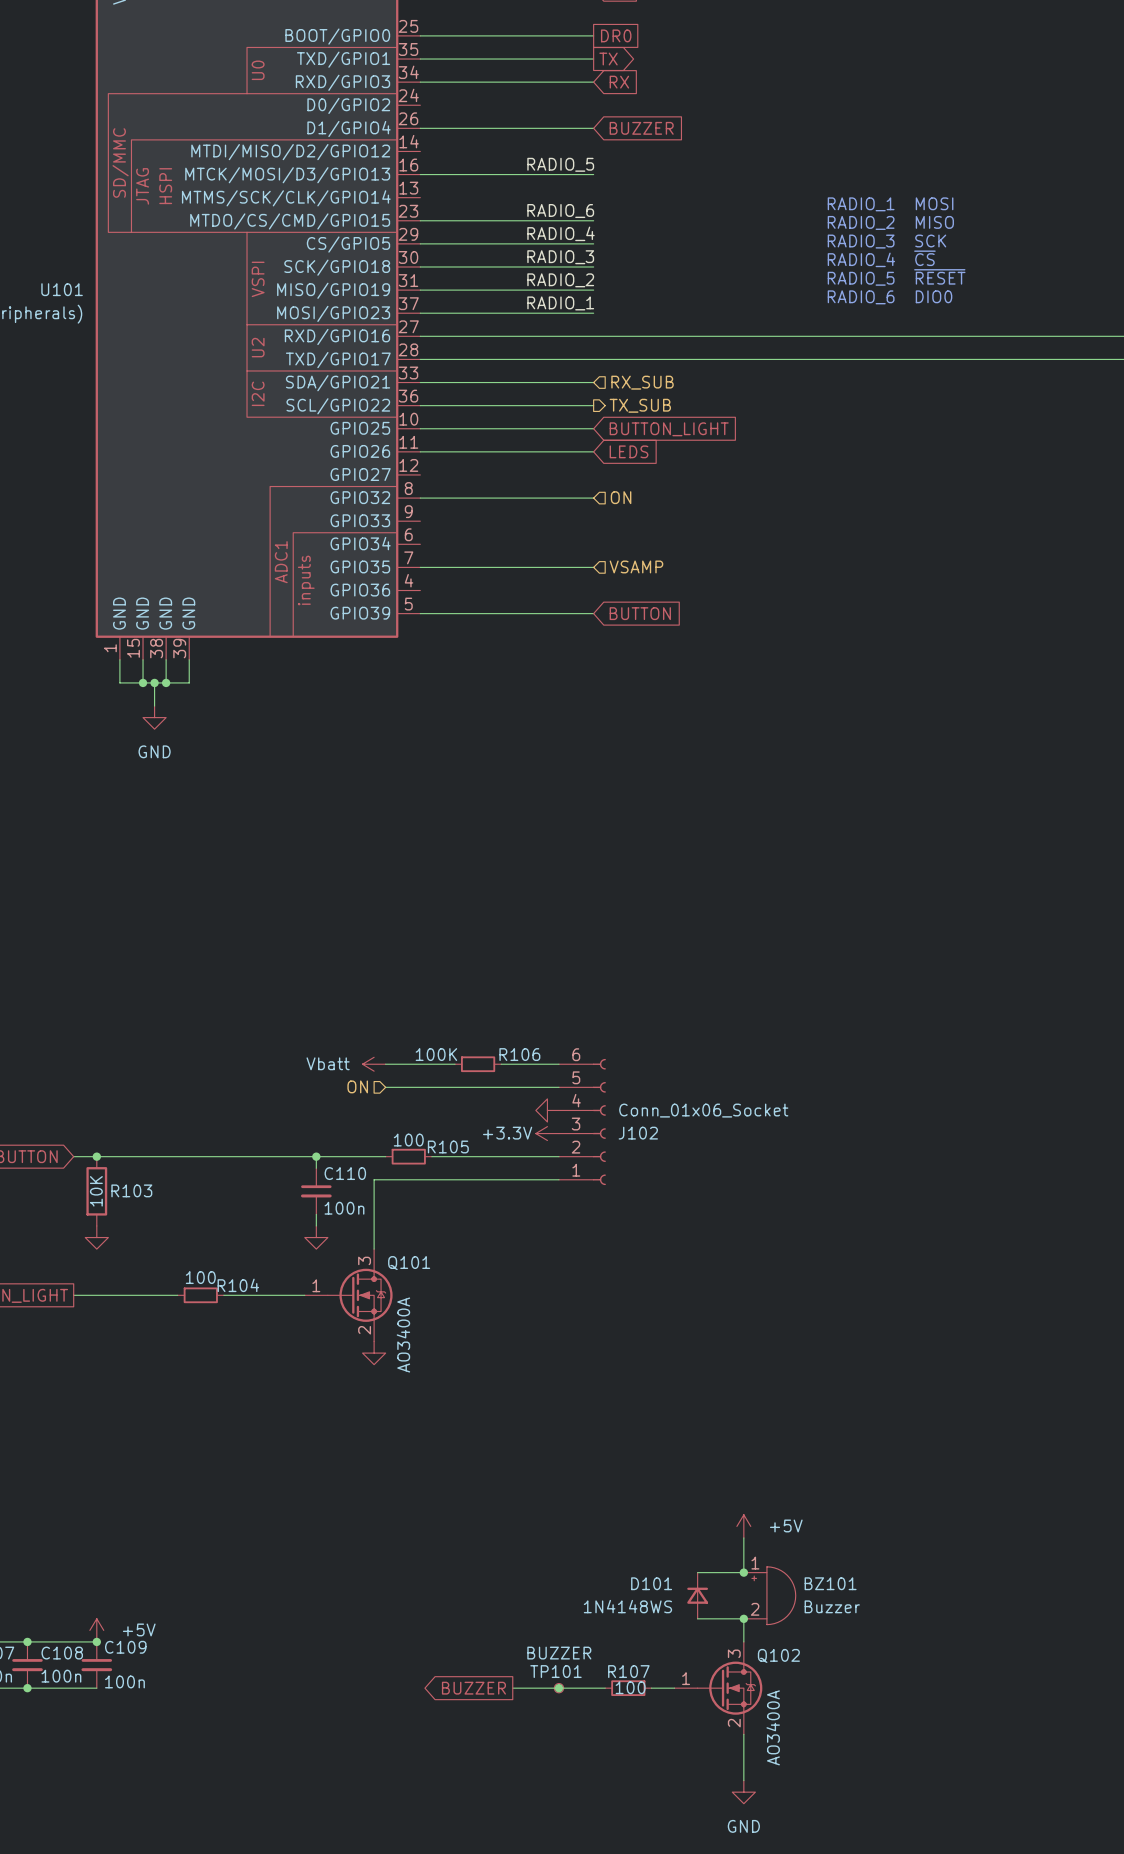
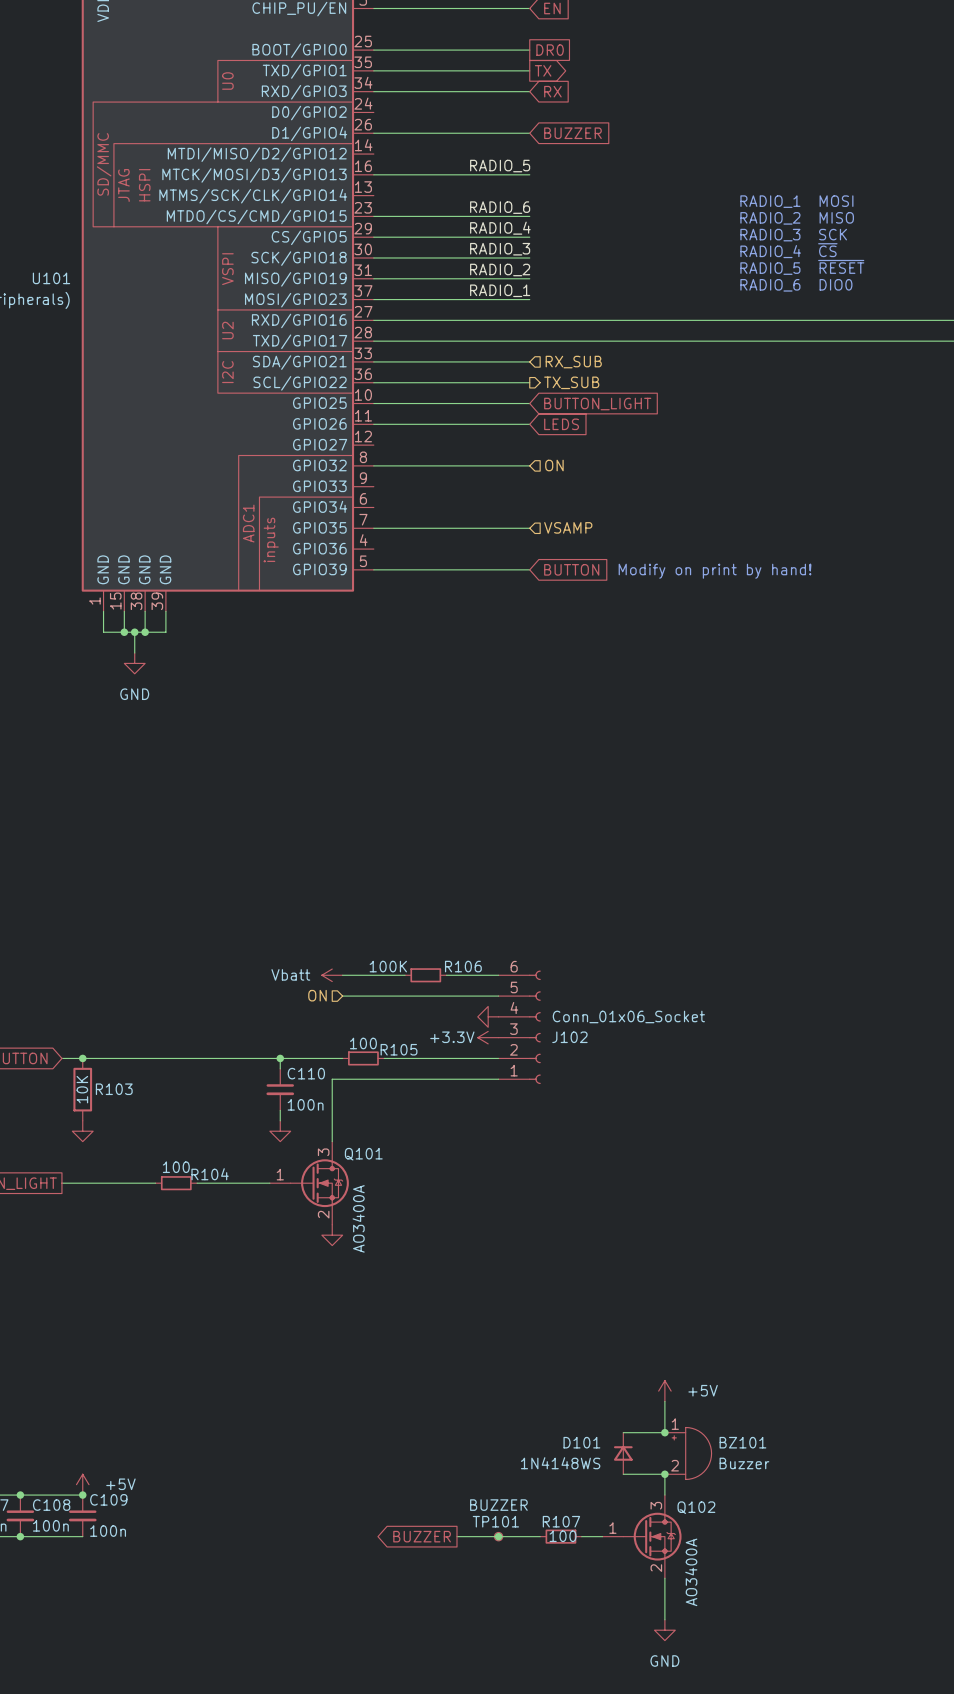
text: none -> Modify on print by hand! (715, 571)

